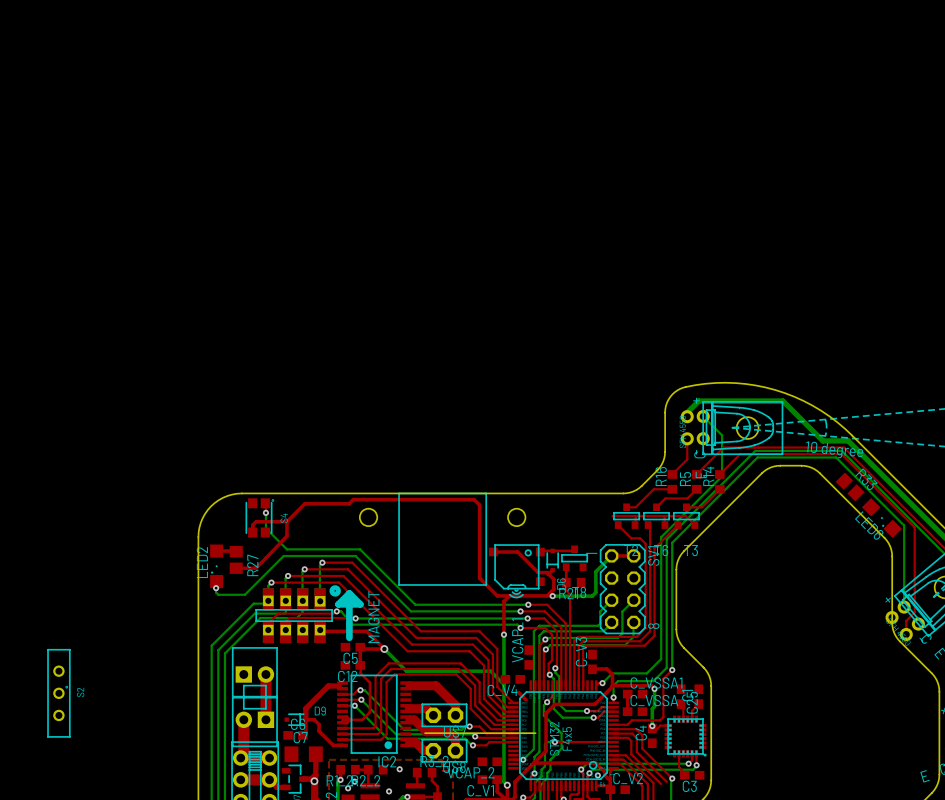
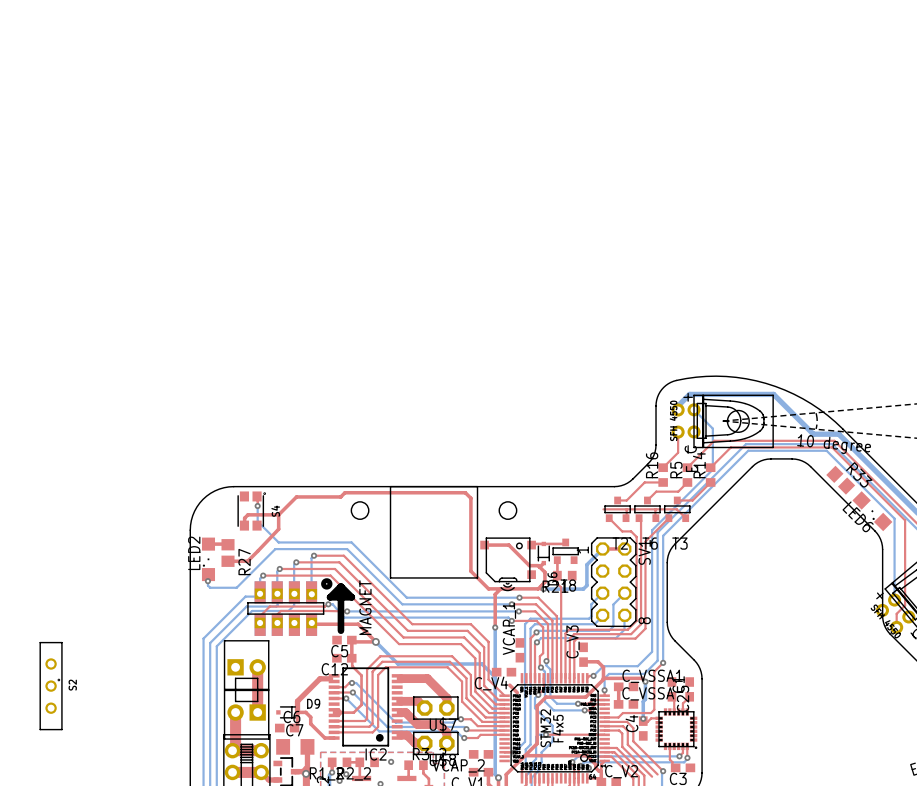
board edge: (425, 733) (535, 733) -> none

